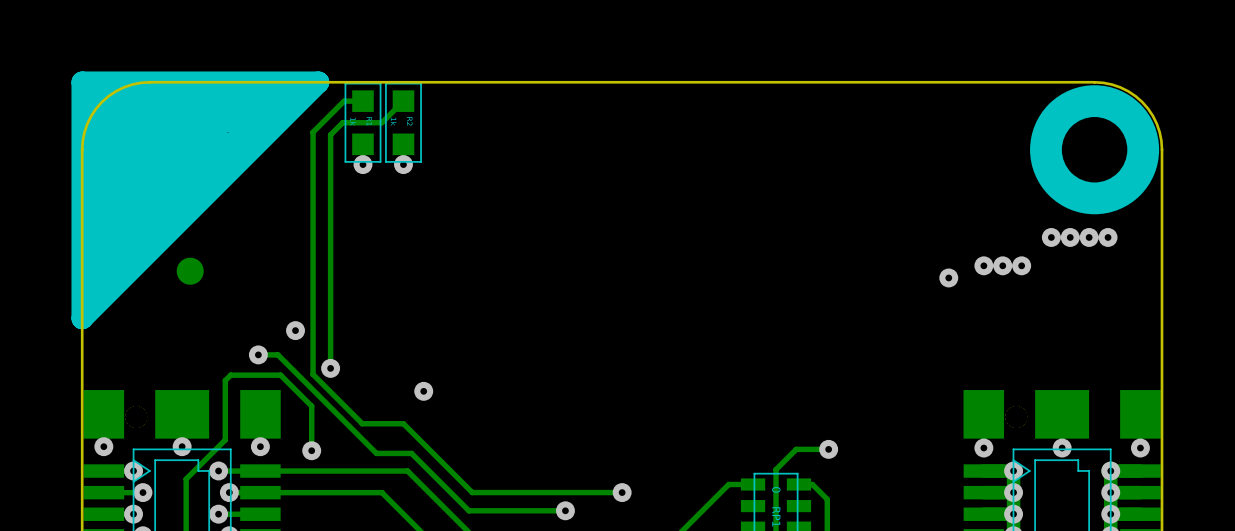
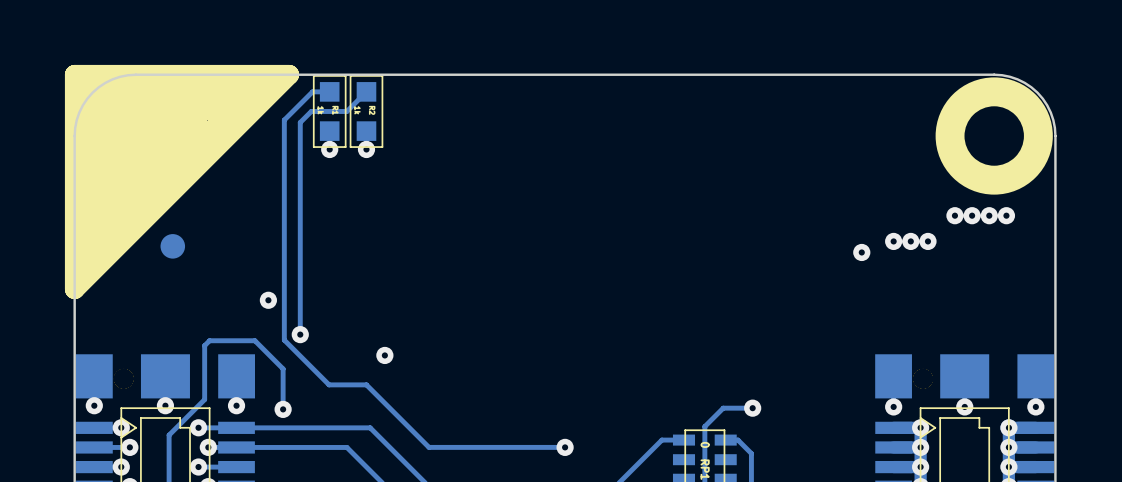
track: (258, 354) (277, 354) (376, 453) (411, 453) (468, 510) (565, 510) -> none
via: (258, 354) -> none
via: (565, 510) -> none

